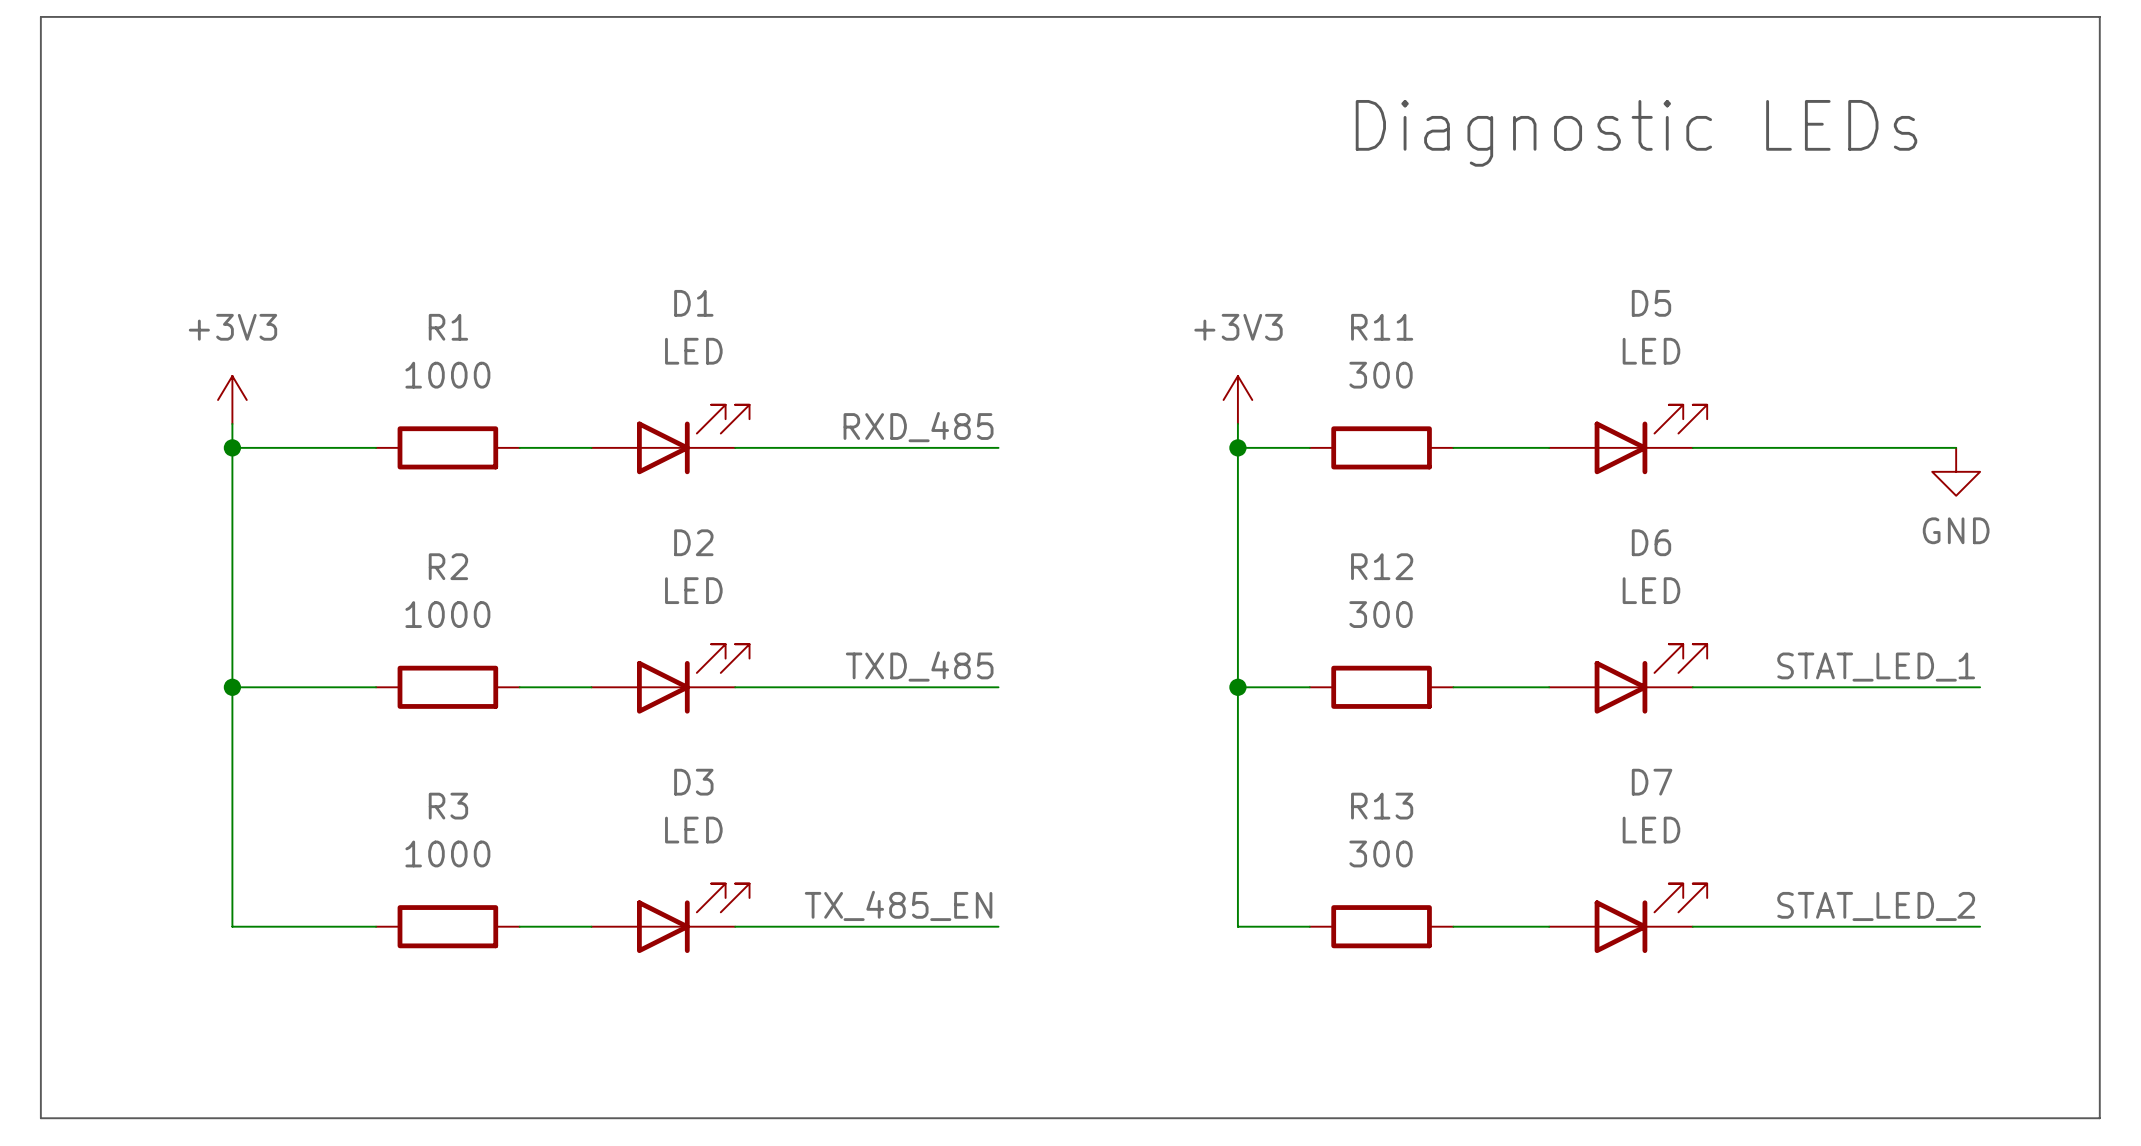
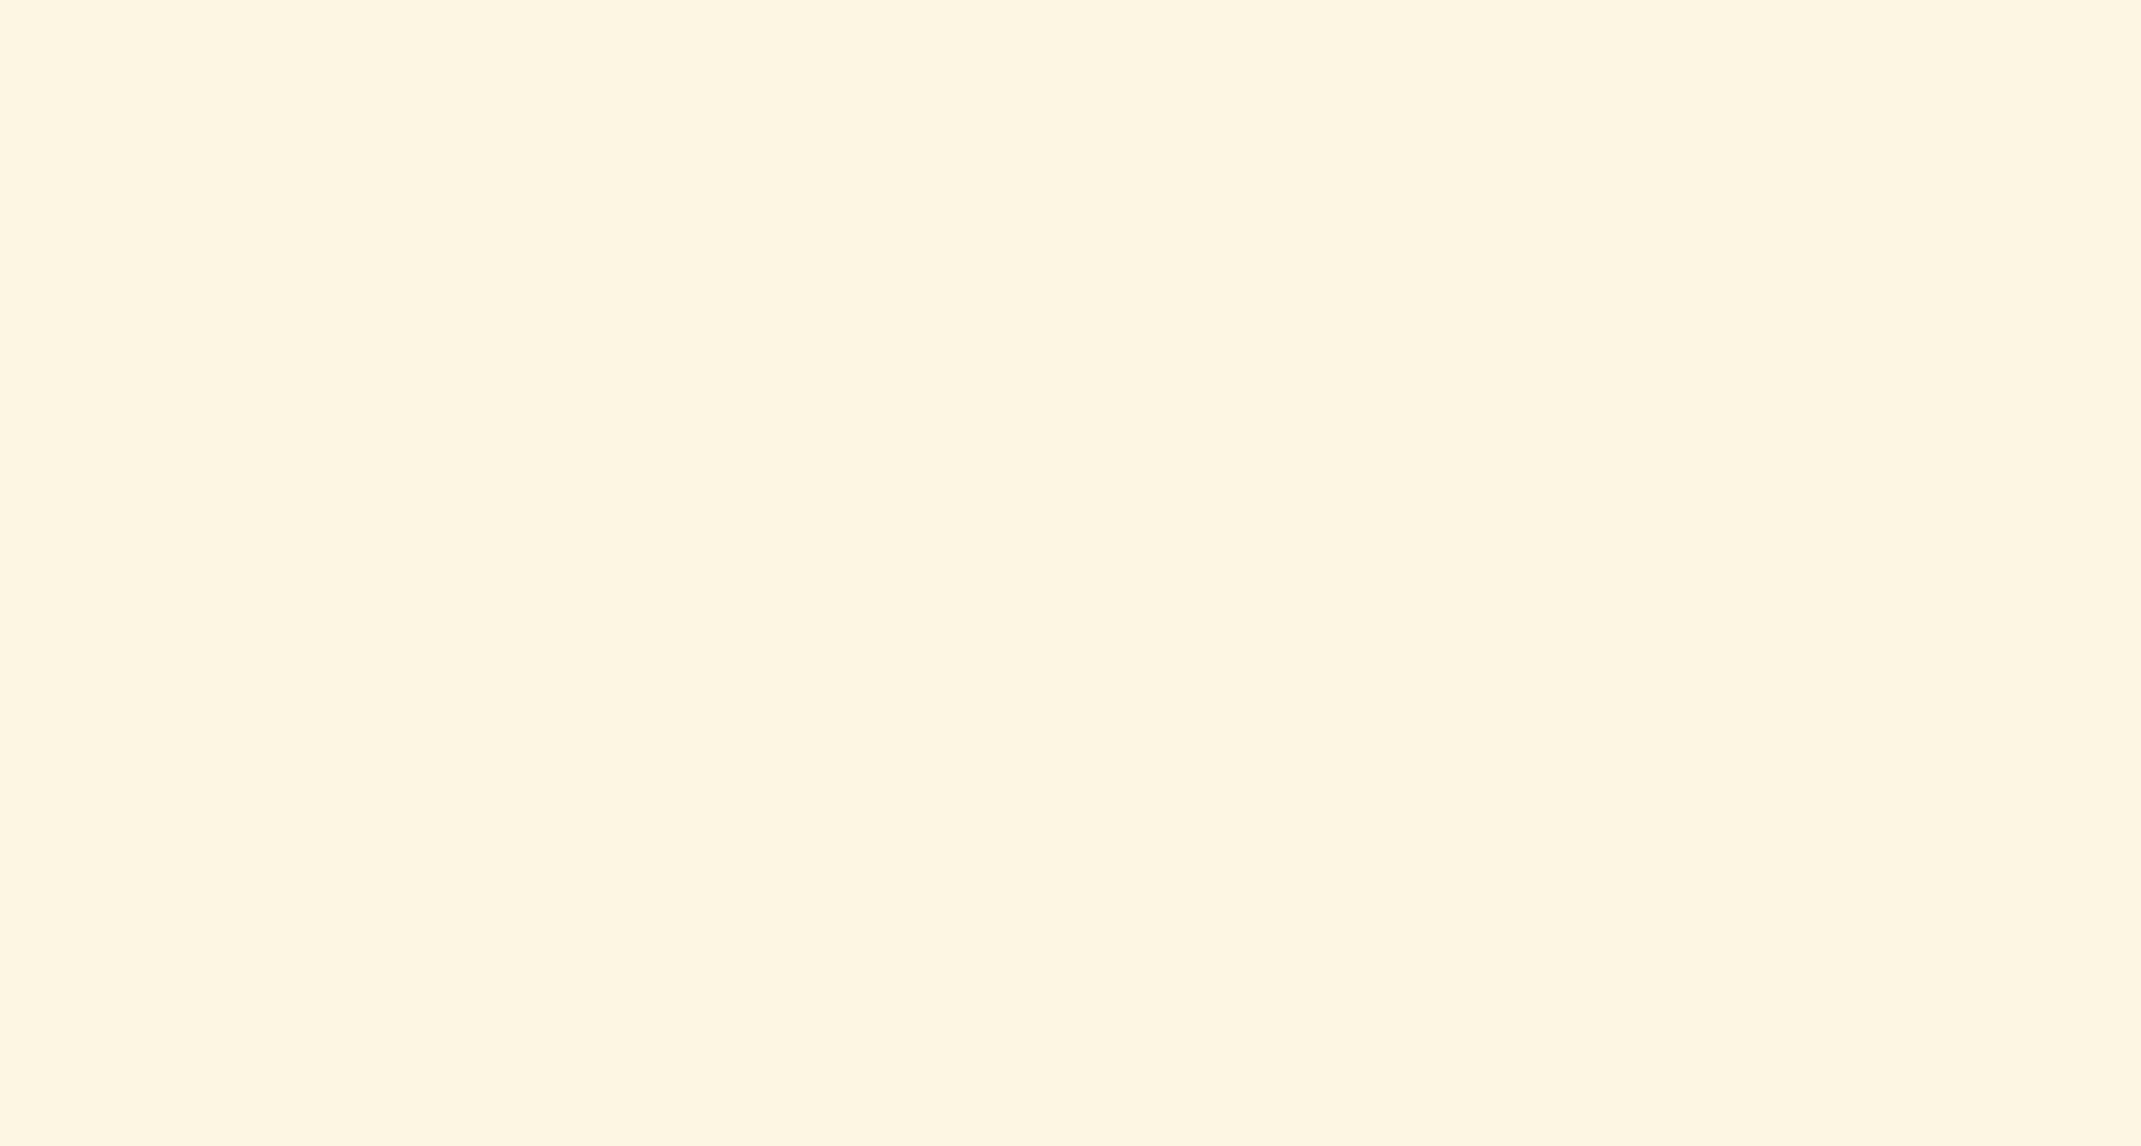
line: (40, 16) (2099, 16) (2099, 1118) (40, 1118) (40, 16) -> none
text: Diagnostic LEDs (1636, 133) -> none
power symbol: +3V3 (232, 400) -> none
power symbol: +3V3 (1237, 400) -> none
wire: (232, 423) (232, 926) (376, 926) -> none
wire: (1237, 423) (1237, 926) (1309, 926) -> none
label: RXD_485 (918, 427) -> none
D1: LED (670, 439) -> none
D5: LED (1628, 439) -> none
wire: (232, 447) (376, 447) -> none
junction: (232, 447) -> none
R1: 1000 (447, 447) -> none
wire: (519, 447) (591, 447) -> none
wire: (735, 447) (998, 447) -> none
wire: (1237, 447) (1309, 447) -> none
junction: (1237, 447) -> none
R11: 300 (1381, 447) -> none
wire: (1453, 447) (1549, 447) -> none
wire: (1692, 447) (1956, 447) -> none
power symbol: GND (1956, 471) -> none
label: TXD_485 (919, 666) -> none
label: STAT_LED_1 (1876, 667) -> none
D2: LED (670, 678) -> none
D6: LED (1628, 678) -> none
wire: (232, 687) (376, 687) -> none
junction: (232, 687) -> none
R2: 1000 (447, 687) -> none
wire: (519, 687) (591, 687) -> none
wire: (735, 687) (998, 687) -> none
wire: (1237, 687) (1309, 687) -> none
junction: (1237, 687) -> none
R12: 300 (1381, 687) -> none
wire: (1453, 687) (1549, 687) -> none
wire: (1692, 687) (1980, 687) -> none
label: TX_485_EN (898, 905) -> none
label: STAT_LED_2 (1876, 906) -> none
D3: LED (670, 918) -> none
D7: LED (1628, 918) -> none
R3: 1000 (447, 926) -> none
wire: (519, 926) (591, 926) -> none
wire: (735, 926) (998, 926) -> none
R13: 300 (1381, 926) -> none
wire: (1453, 926) (1549, 926) -> none
wire: (1692, 926) (1980, 926) -> none

